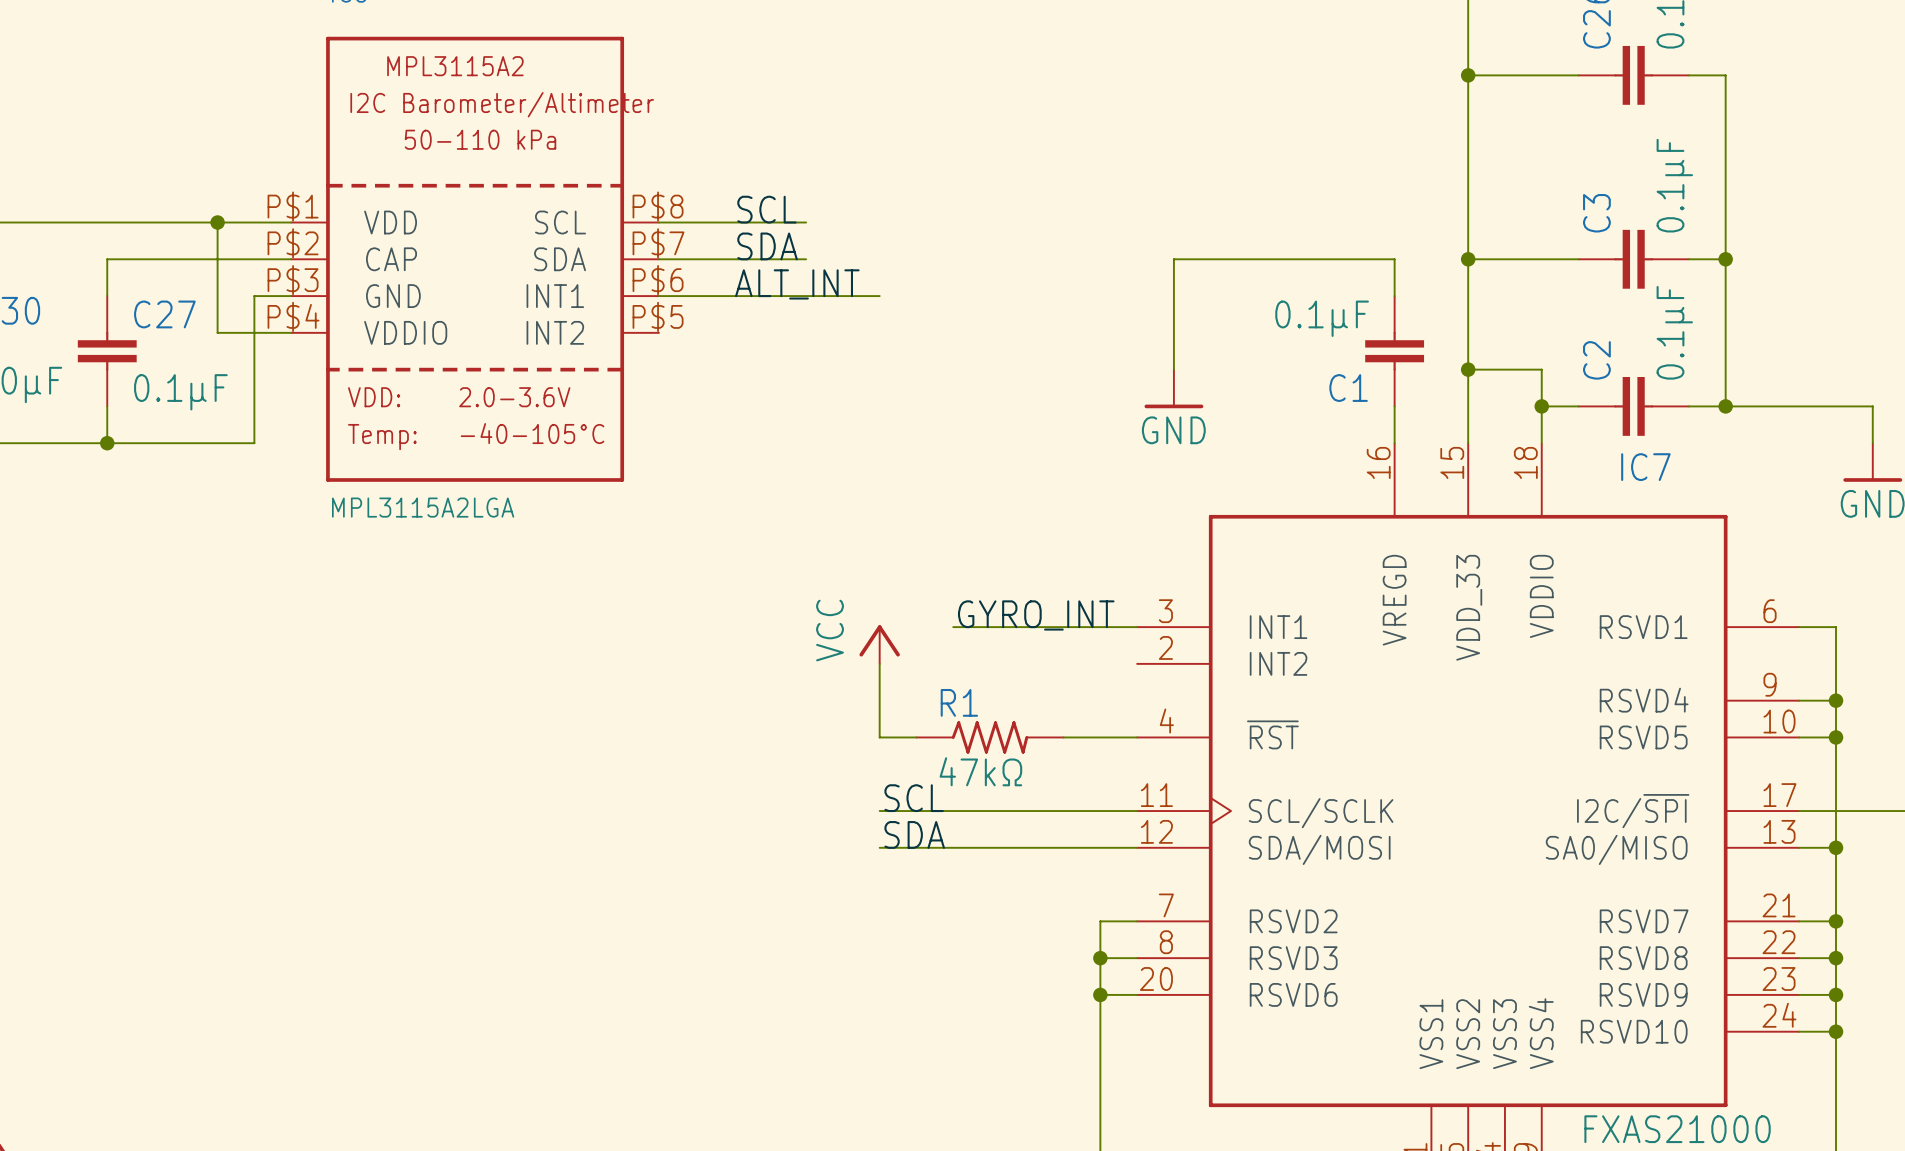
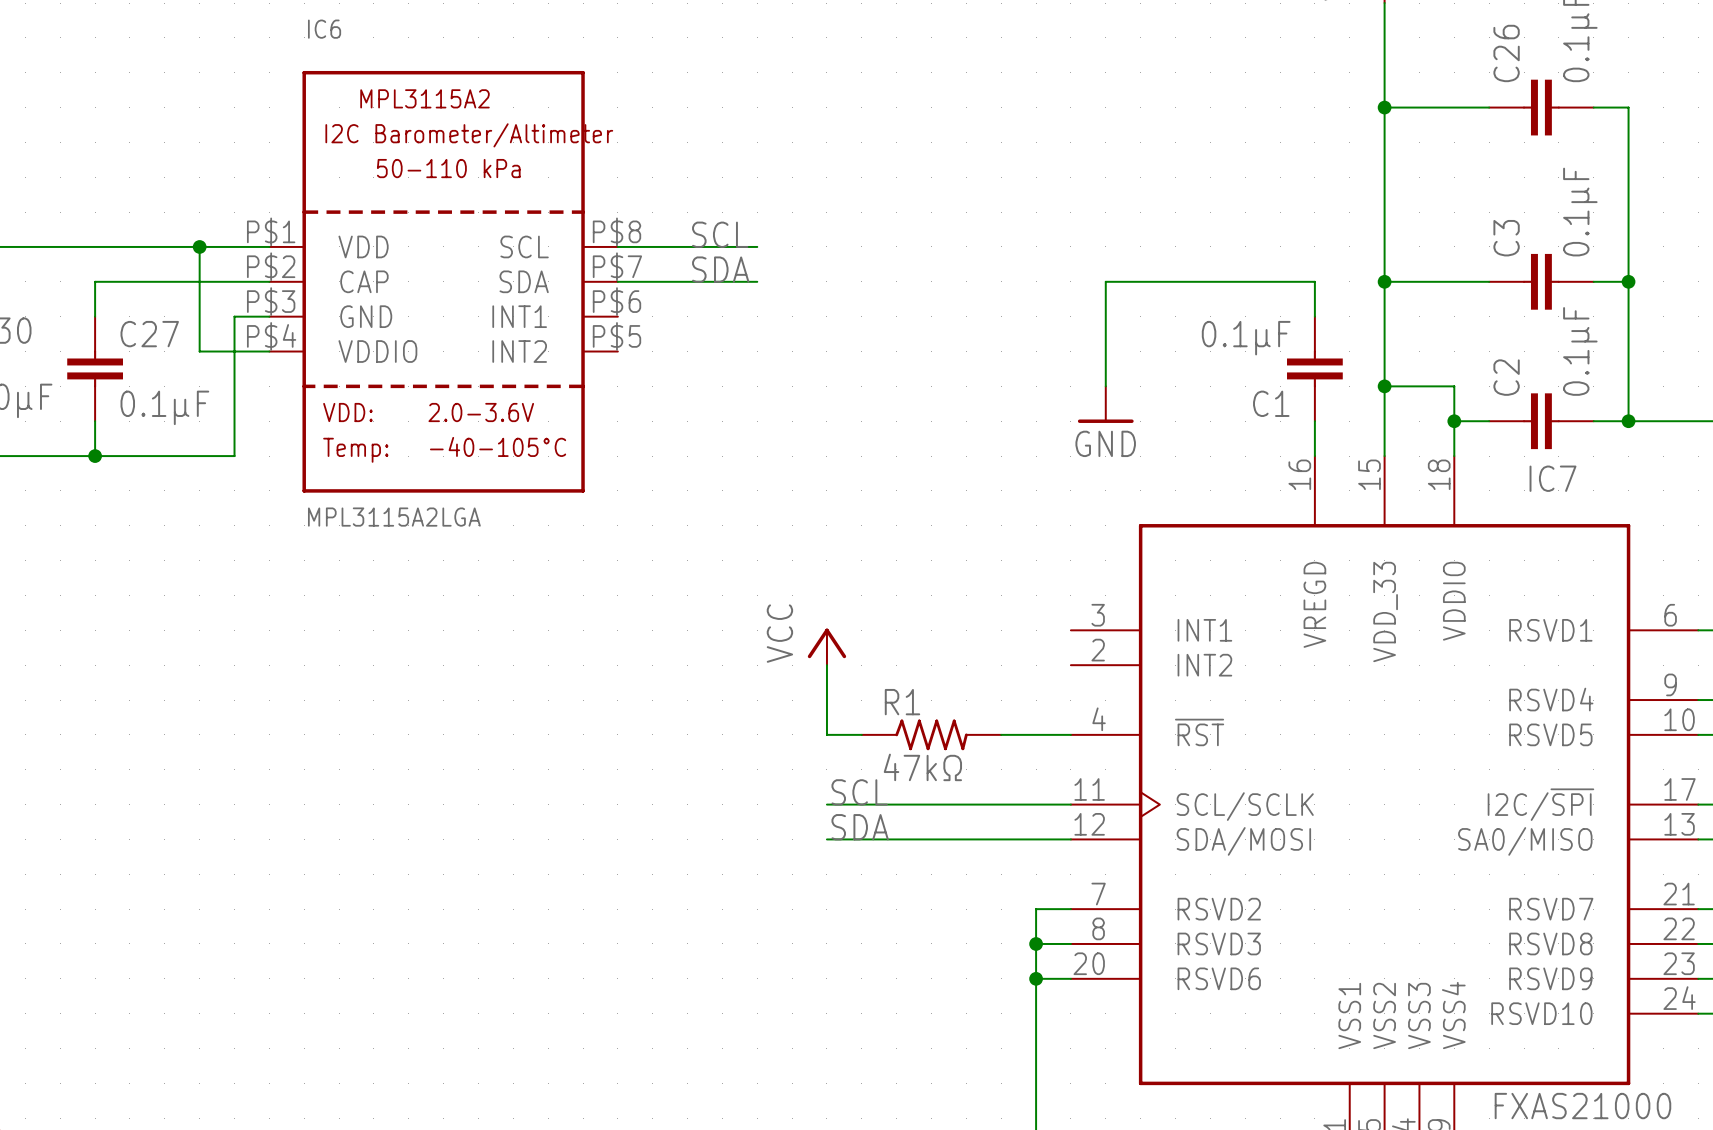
label: ALT_INT (797, 284) -> none
wire: (658, 296) (879, 296) -> none
label: GYRO_INT (1036, 615) -> none
wire: (953, 627) (1137, 627) -> none

